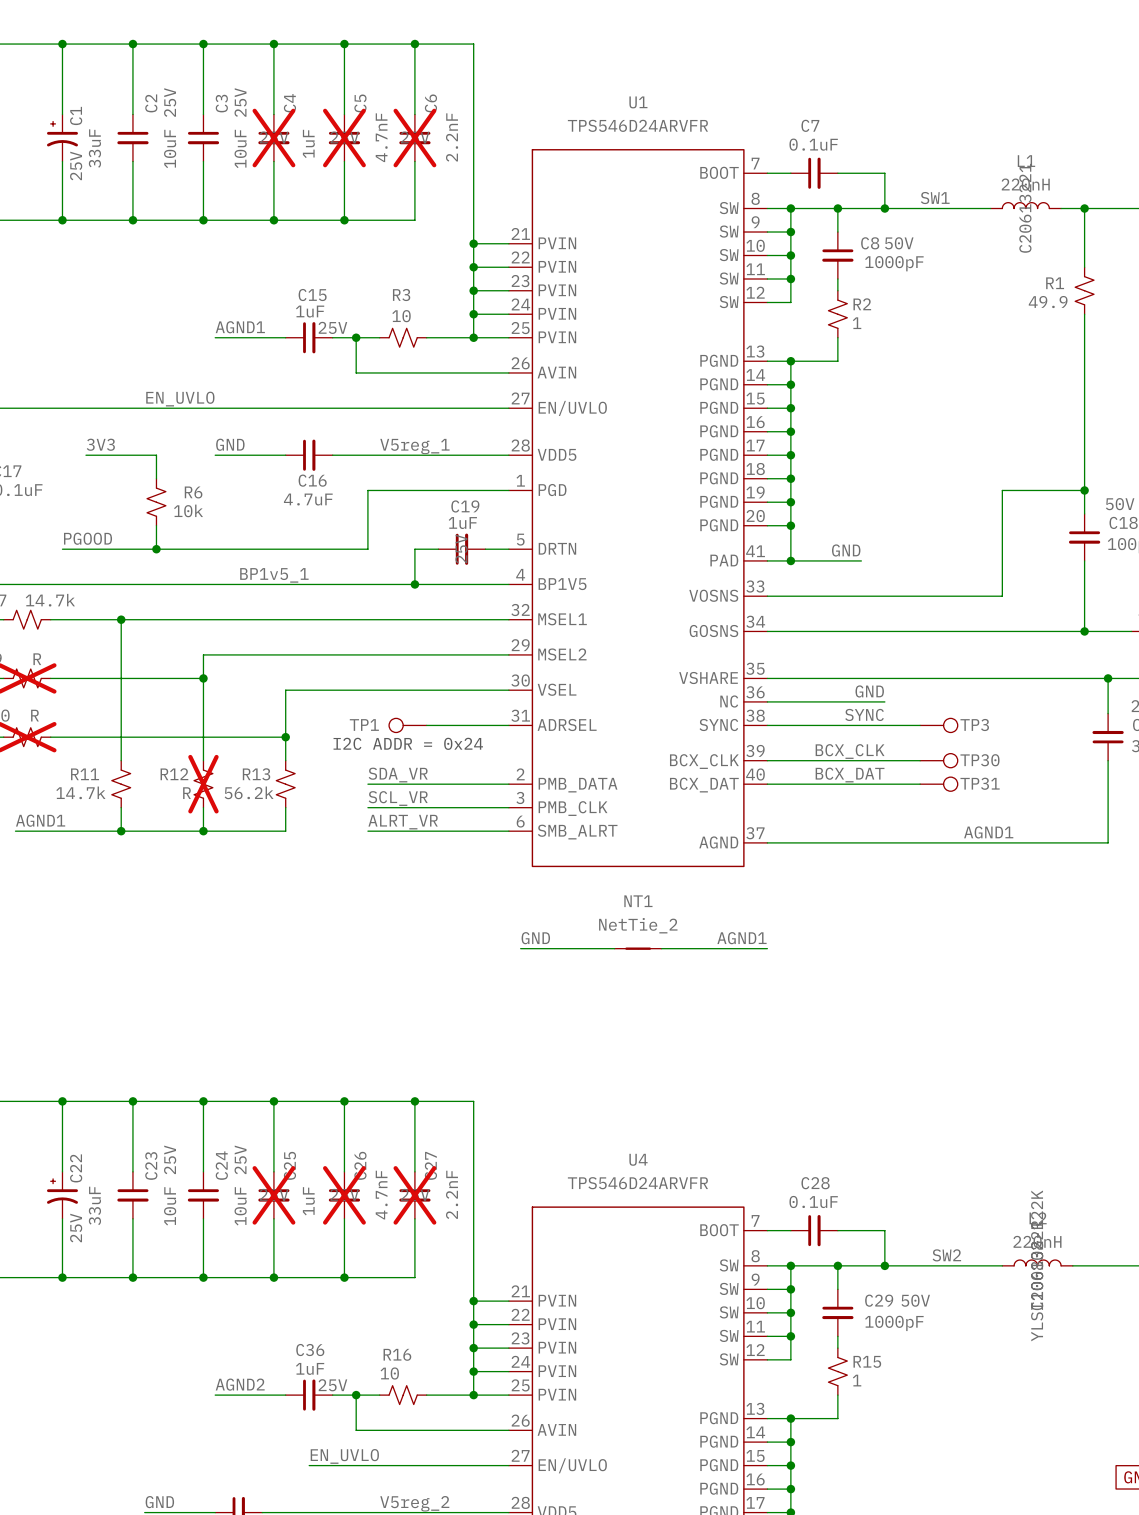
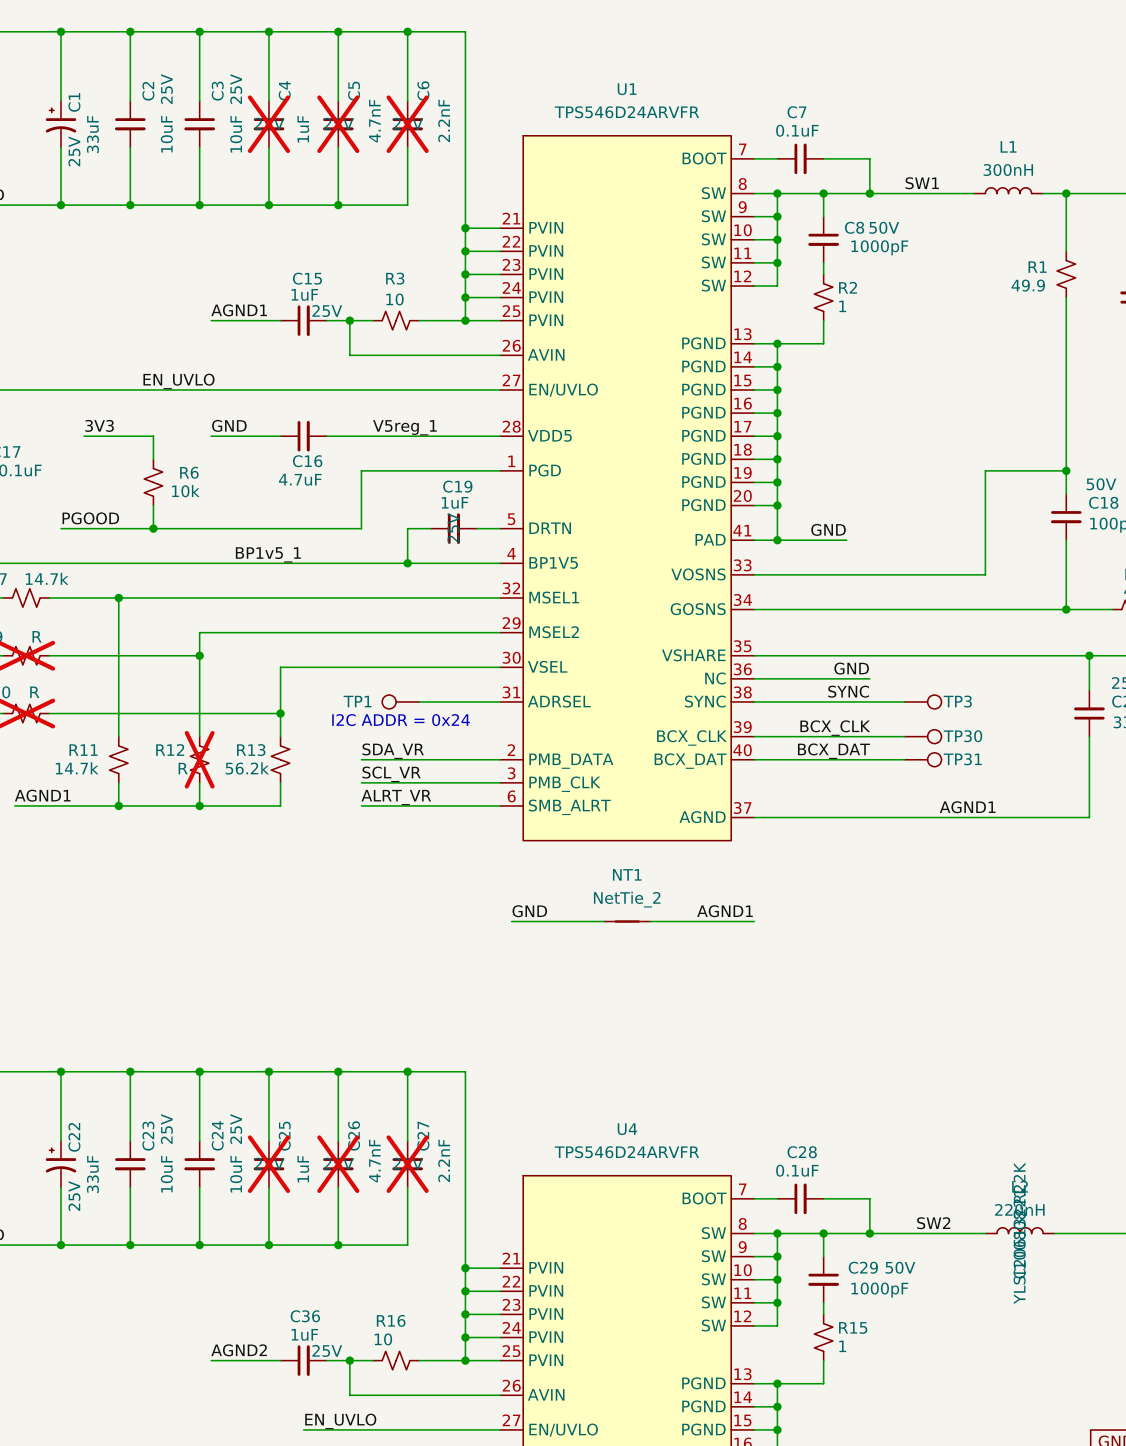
L1 value: 220nH (1025, 184) -> 300nH (1008, 170)
L1 text: C20613221 (1025, 208) -> none

